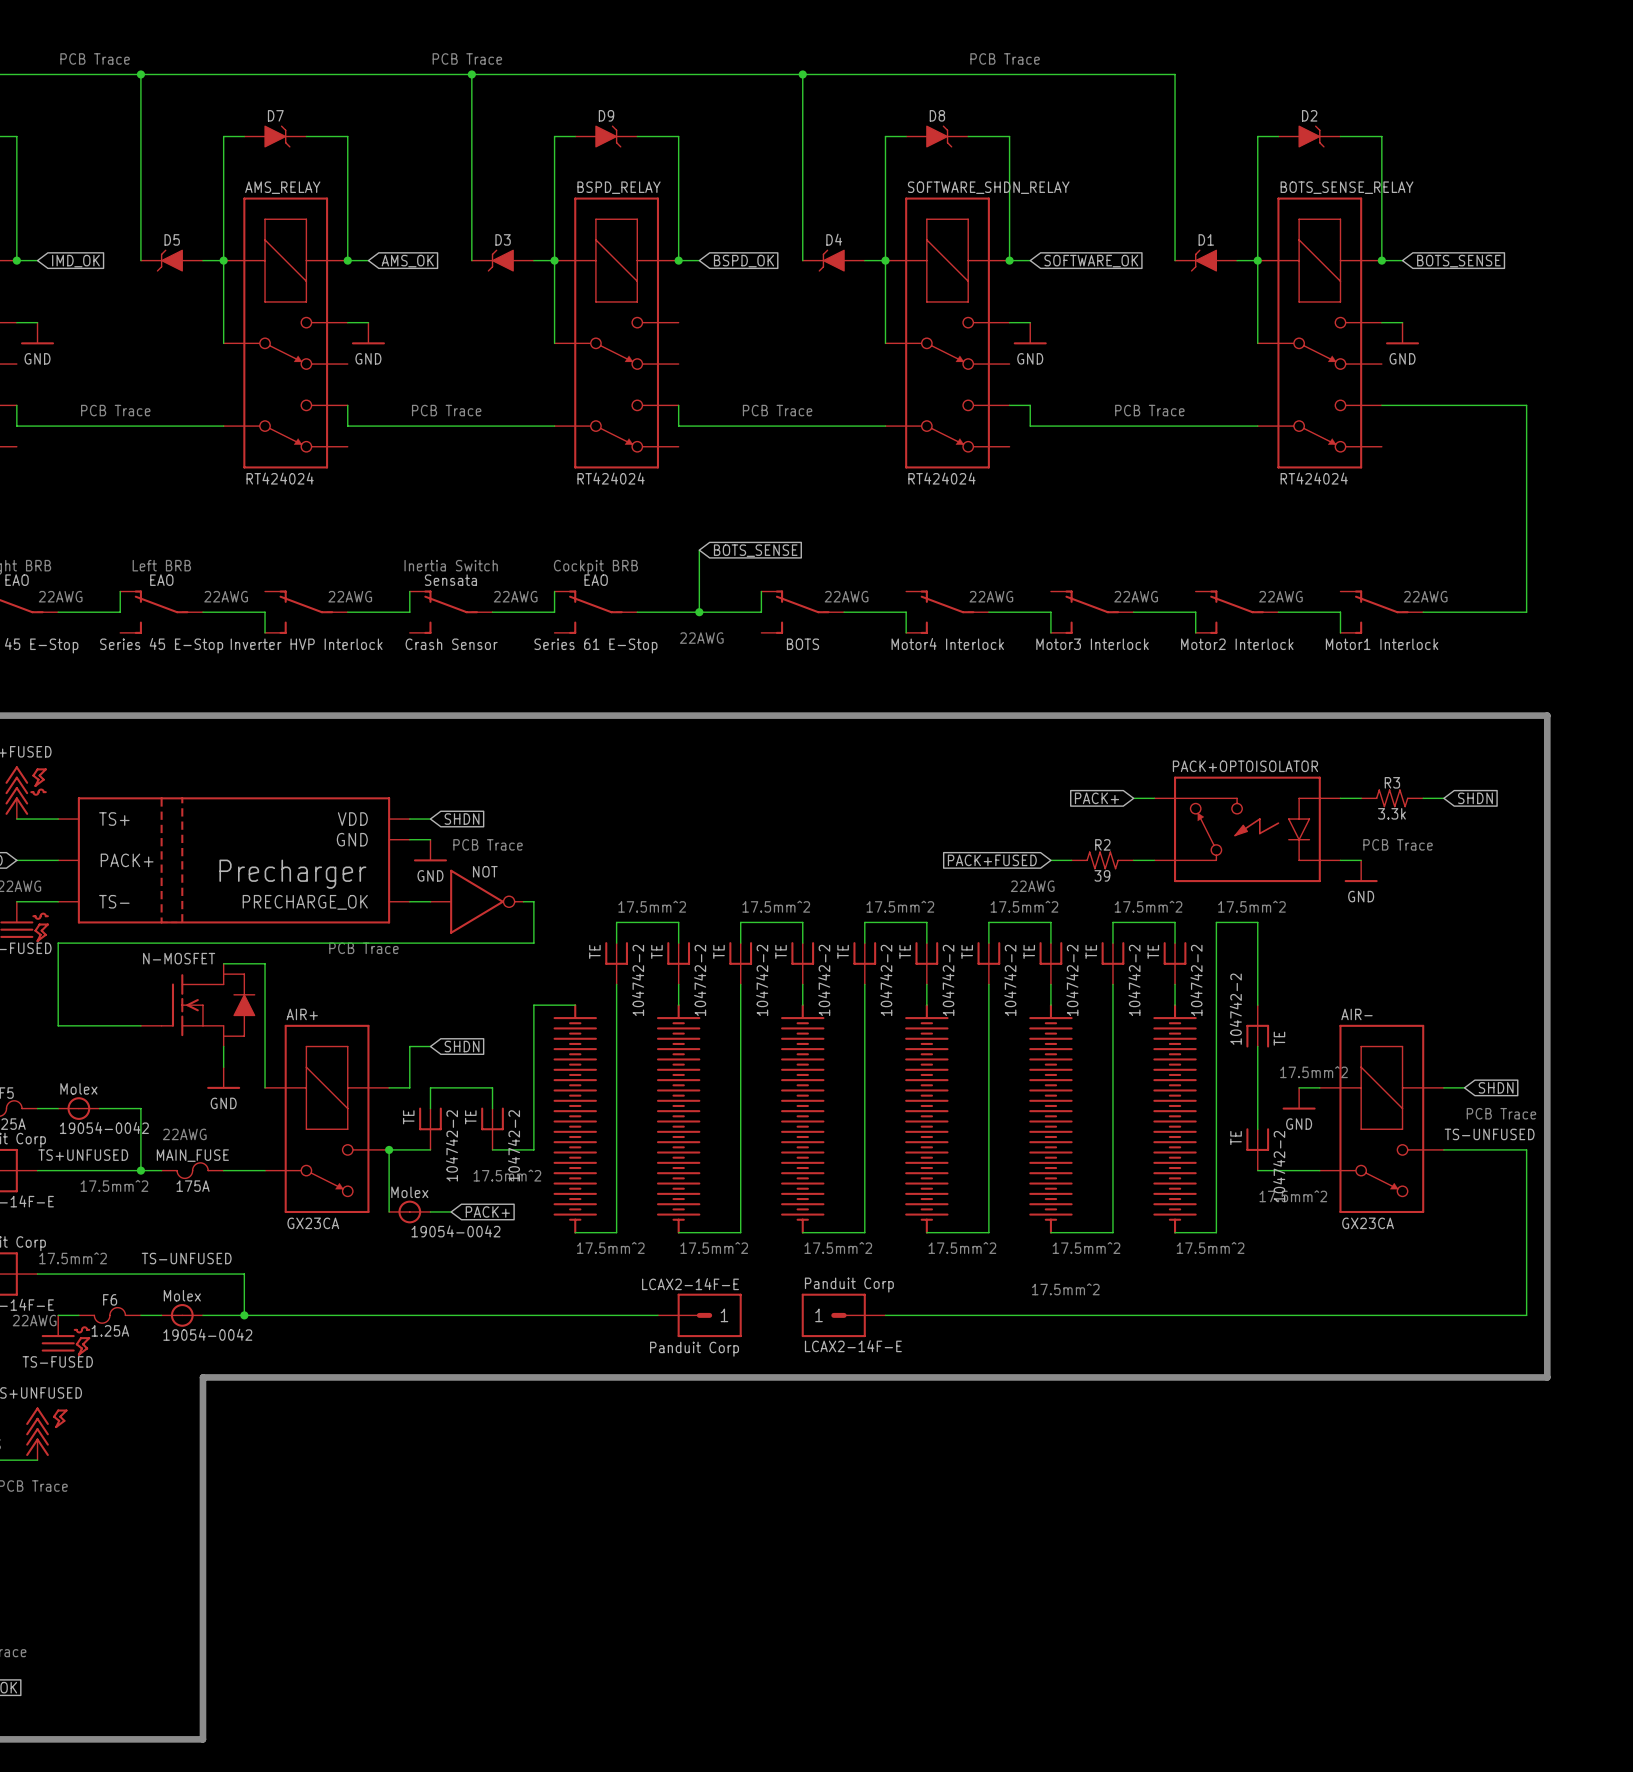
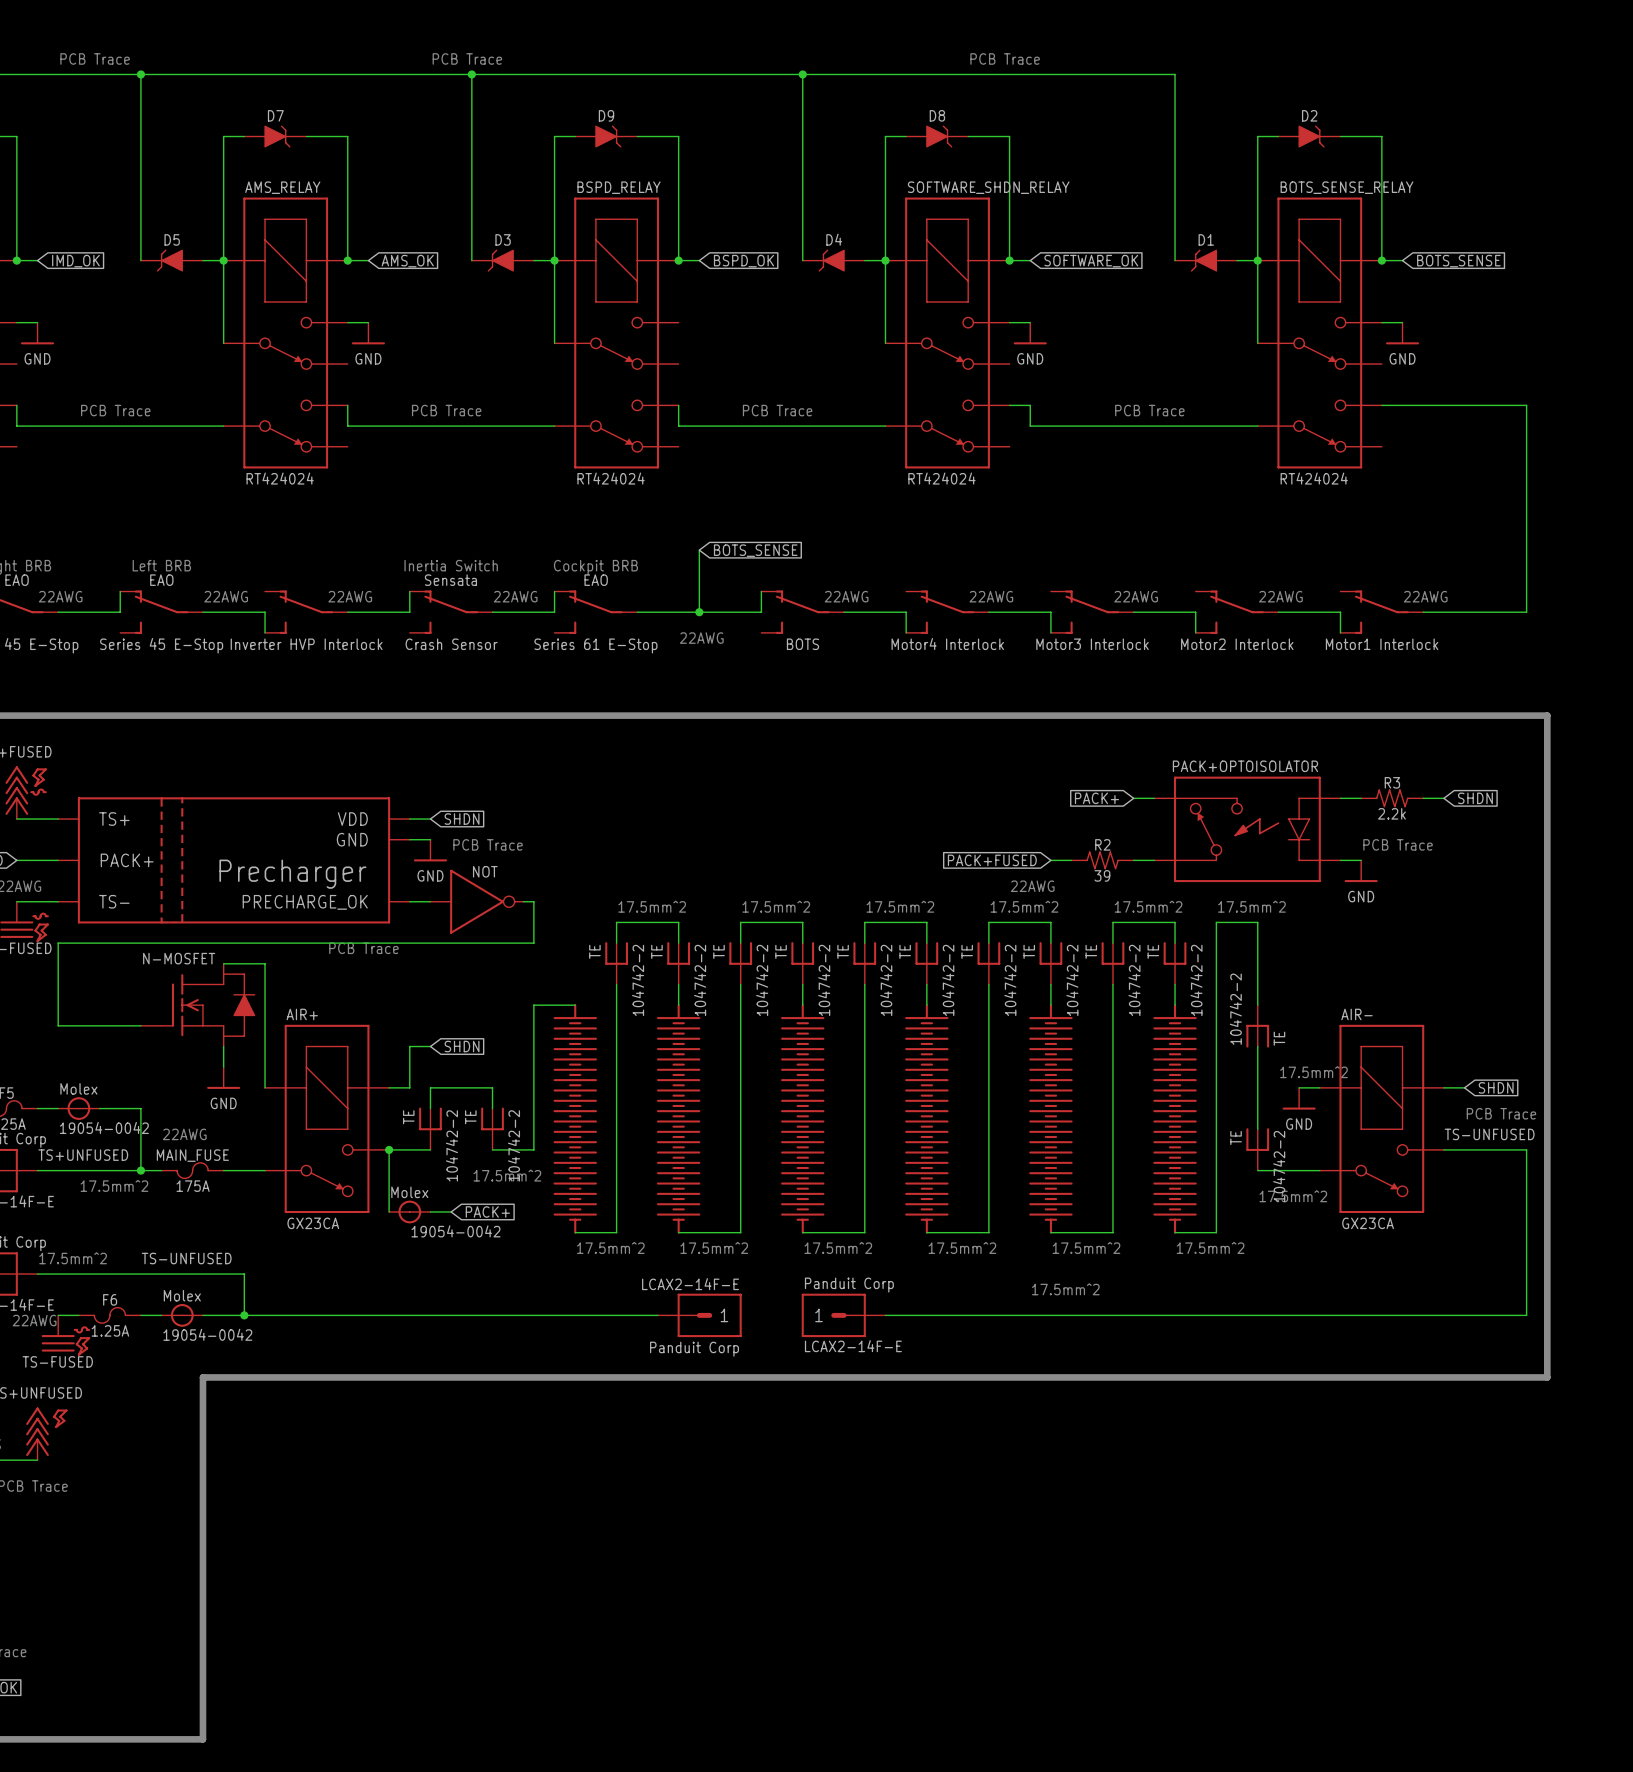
R3 value: 3.3k (1391, 813) -> 2.2k (1391, 813)

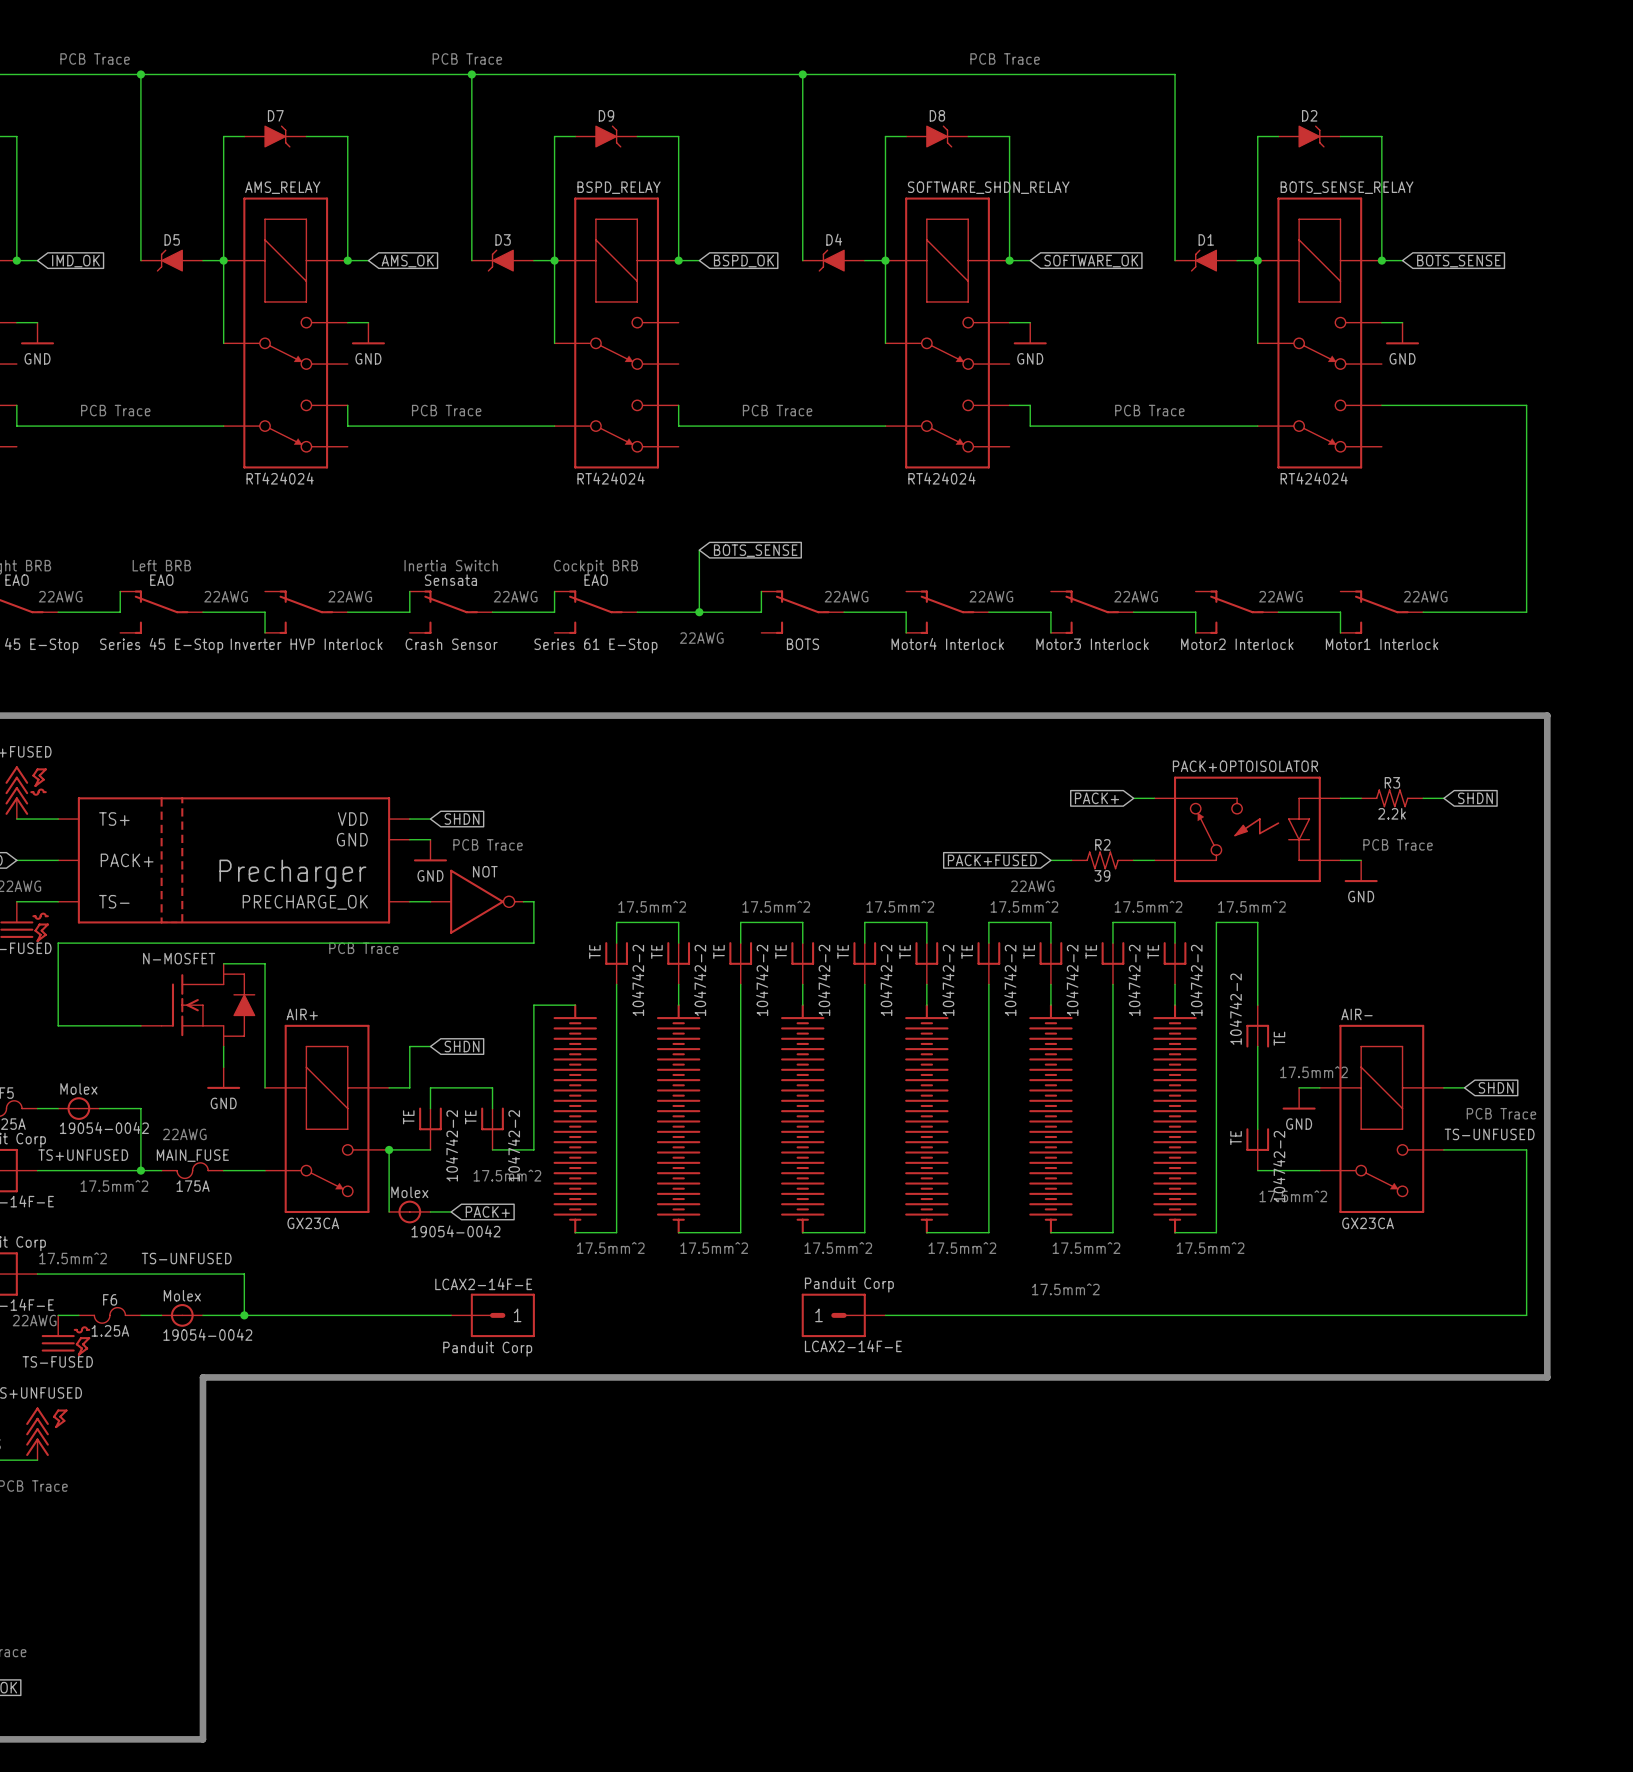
wire: (451, 1315) (657, 1315) -> none
part: none -> (493, 1315)
part: (699, 1315) -> none

